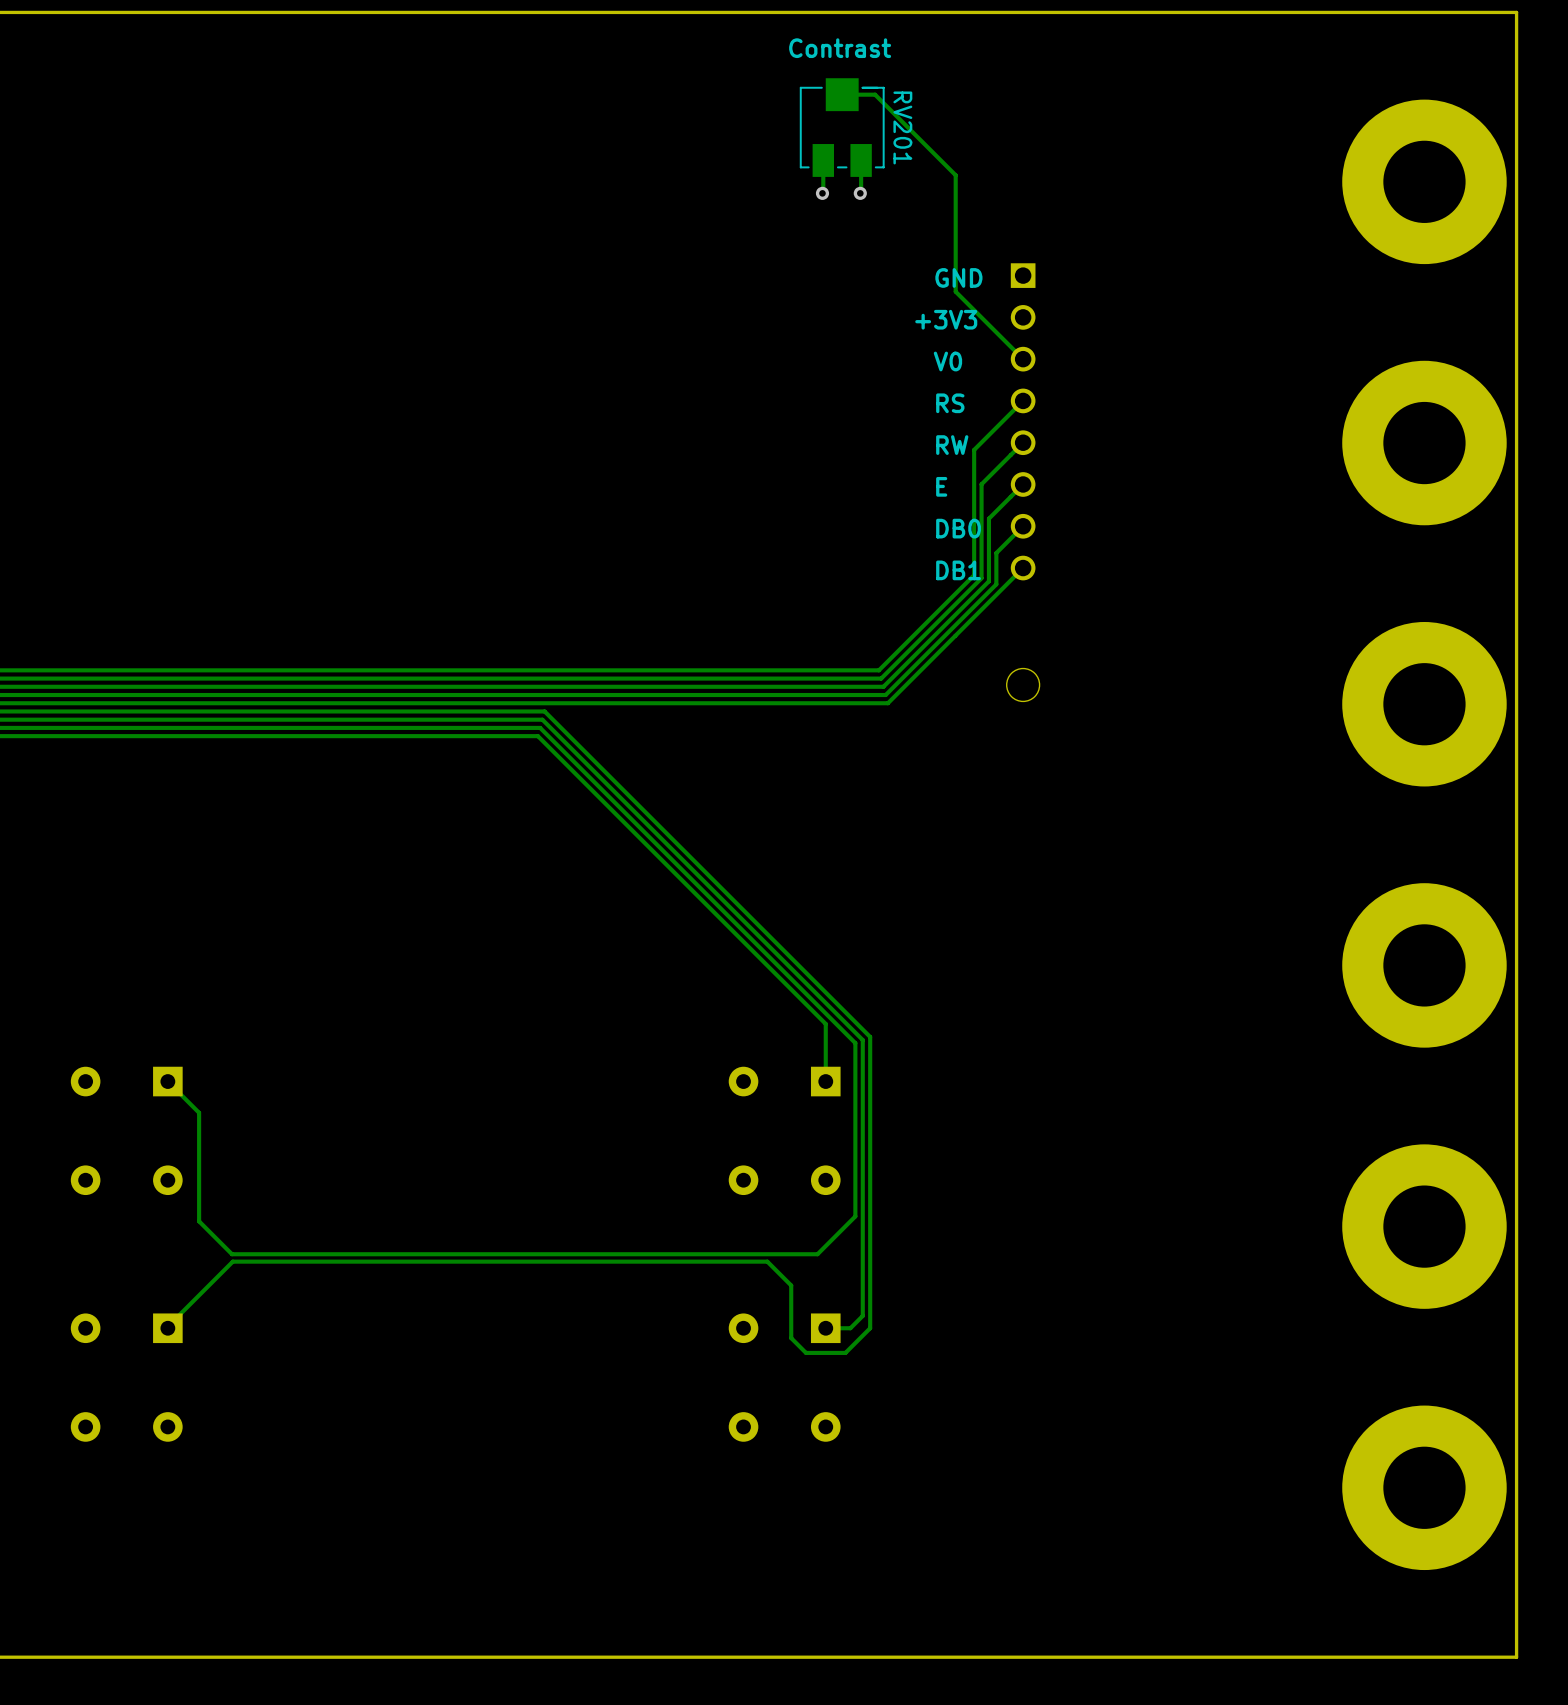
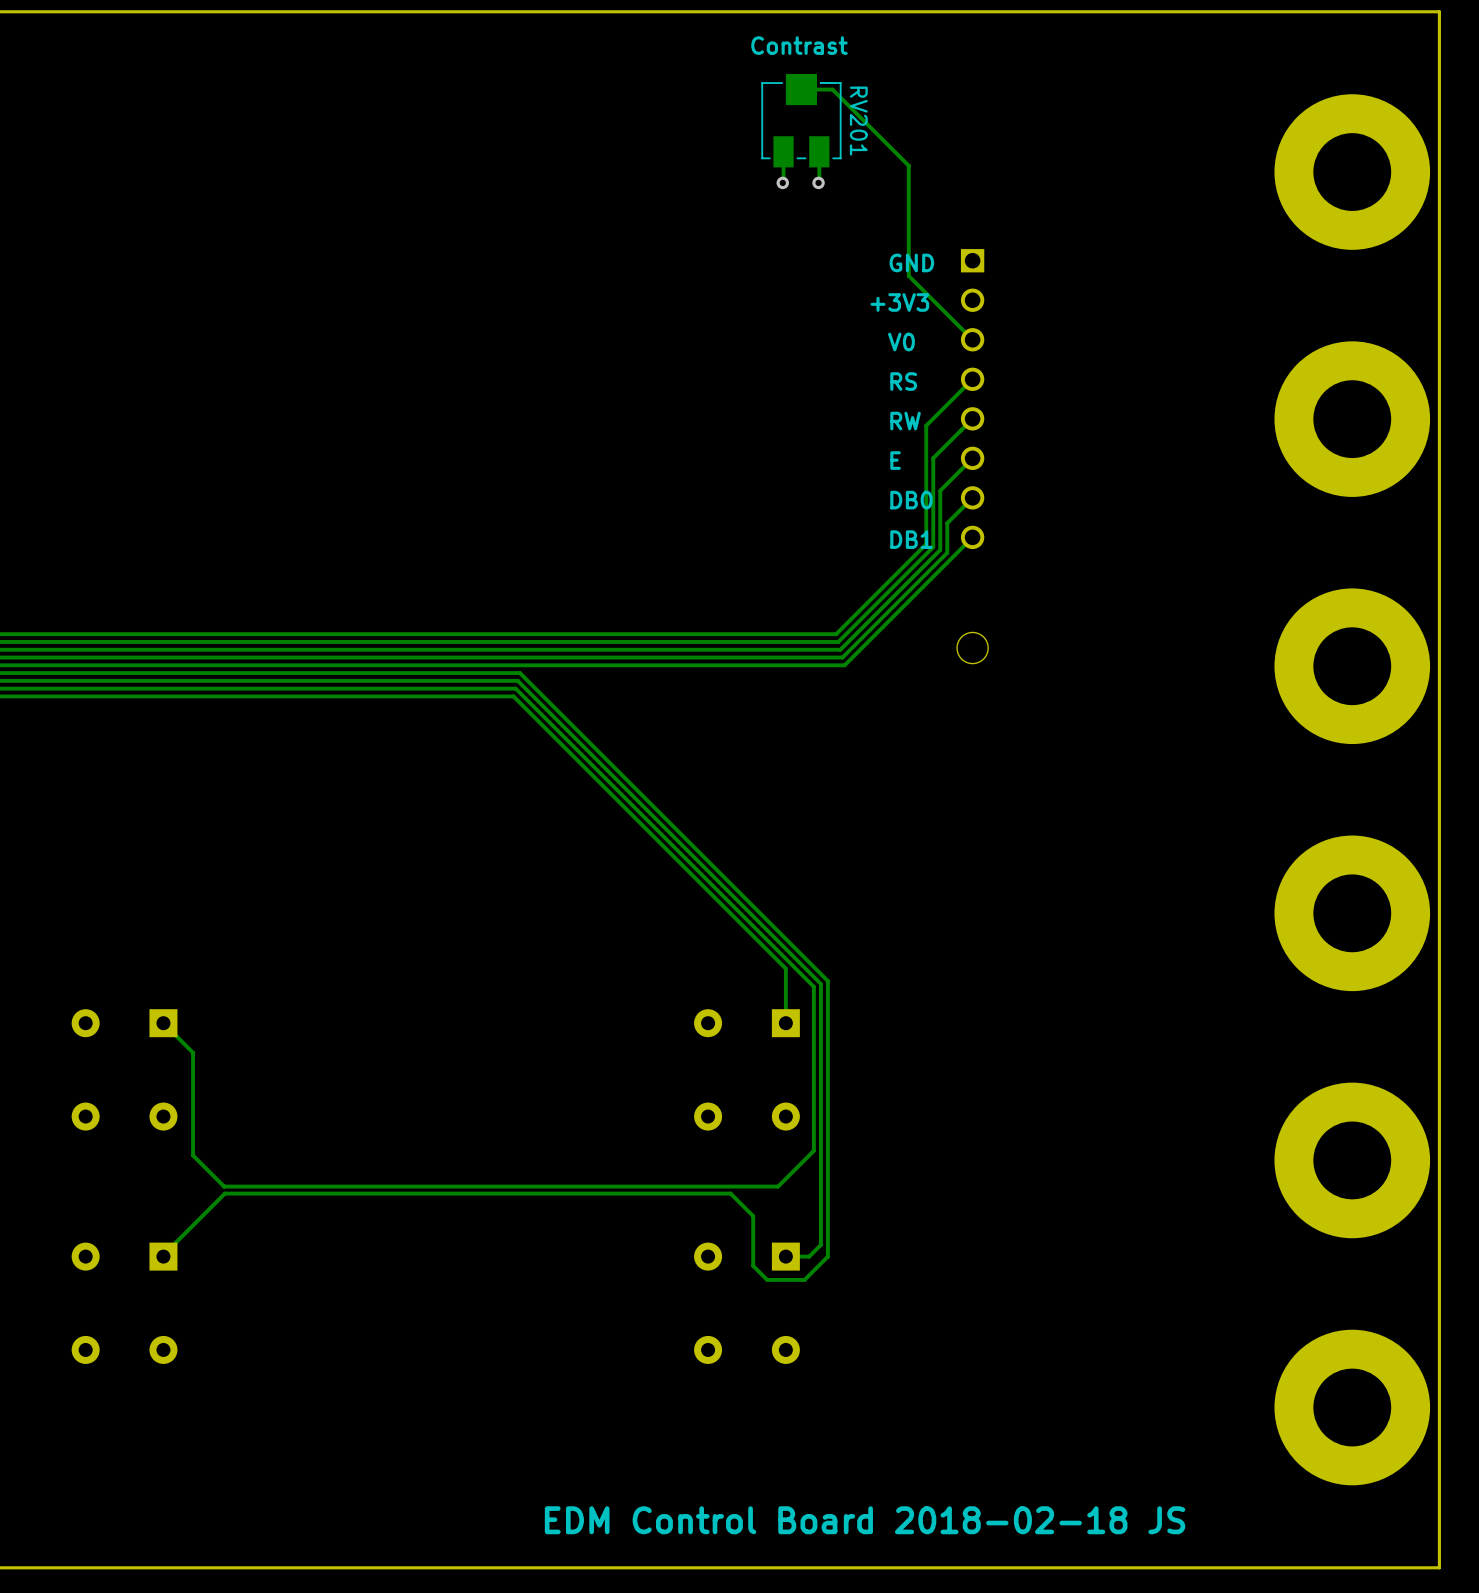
text: none -> EDM Control Board 2018-02-18 JS (865, 1520)

